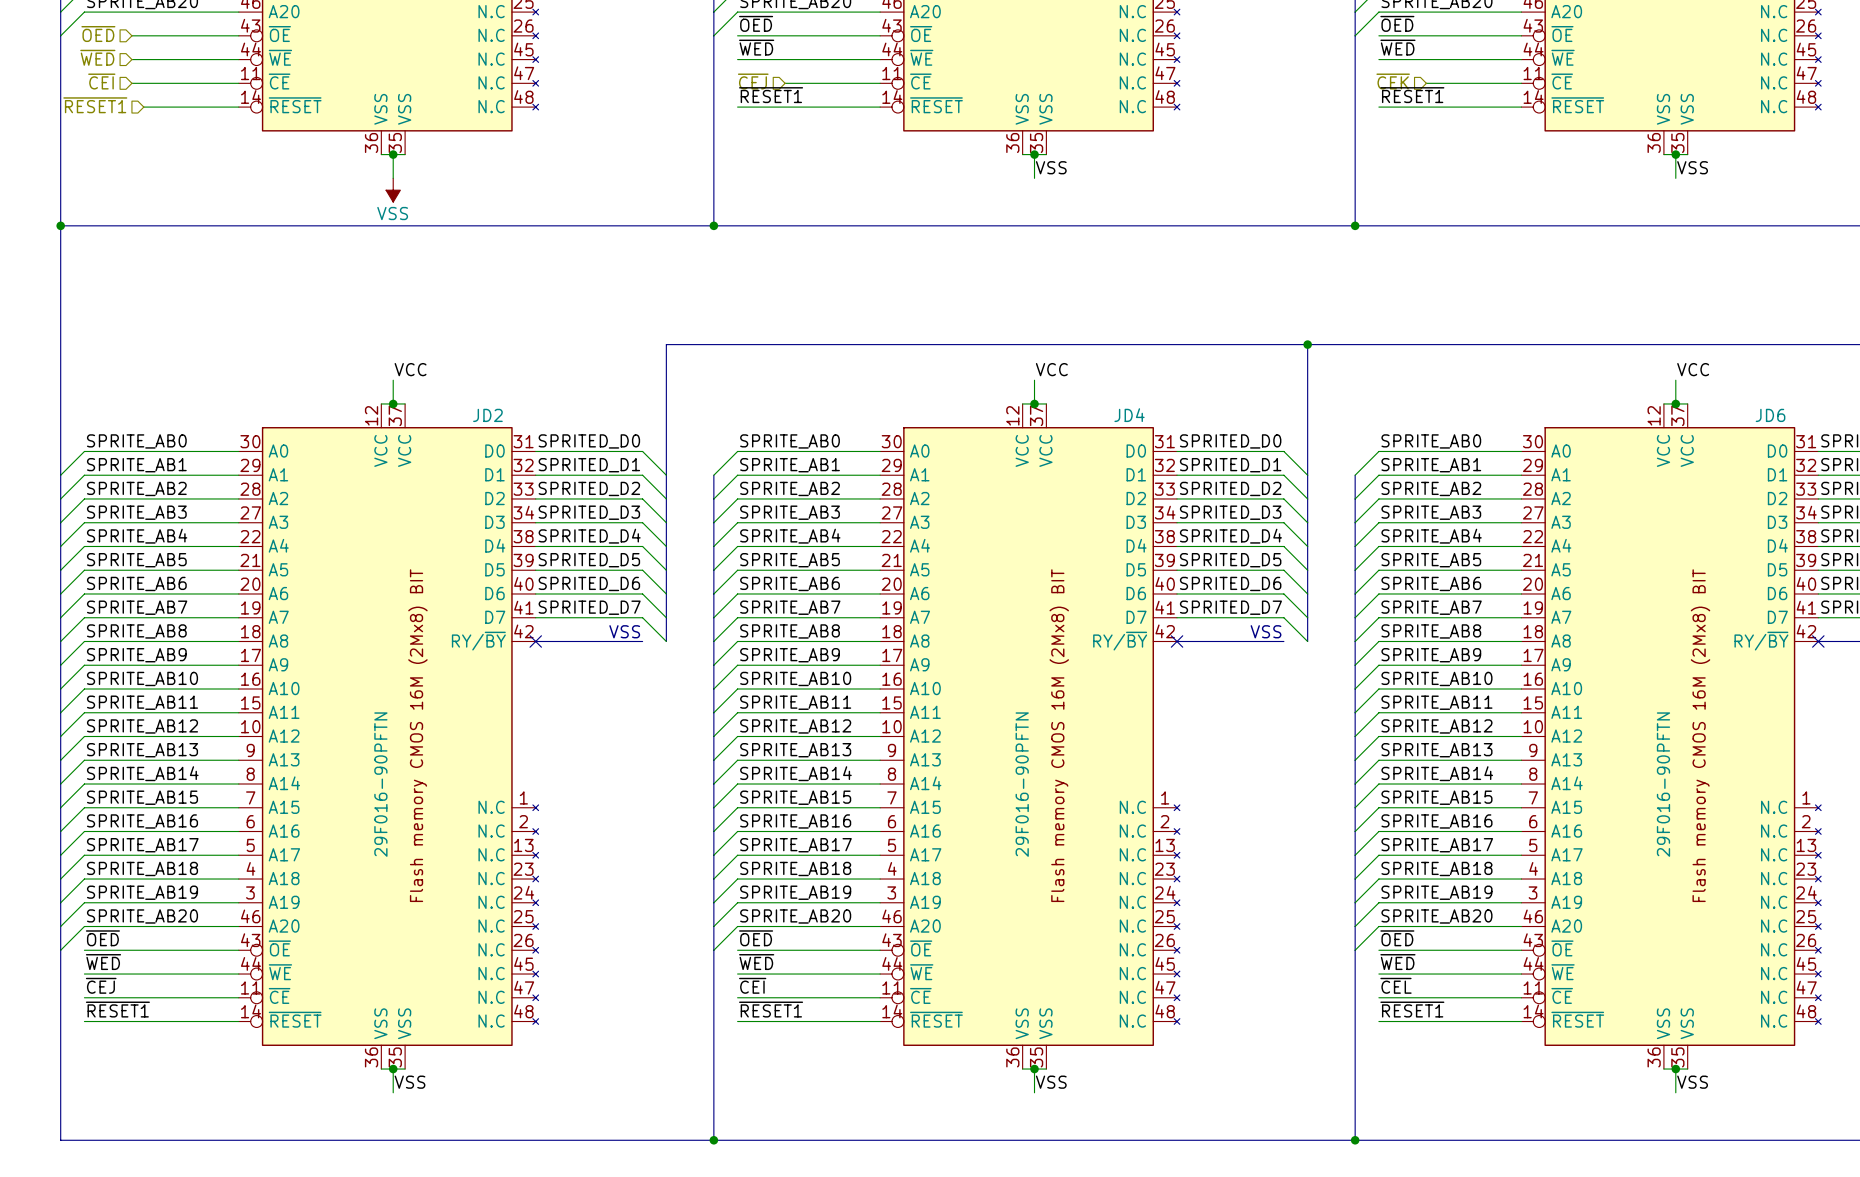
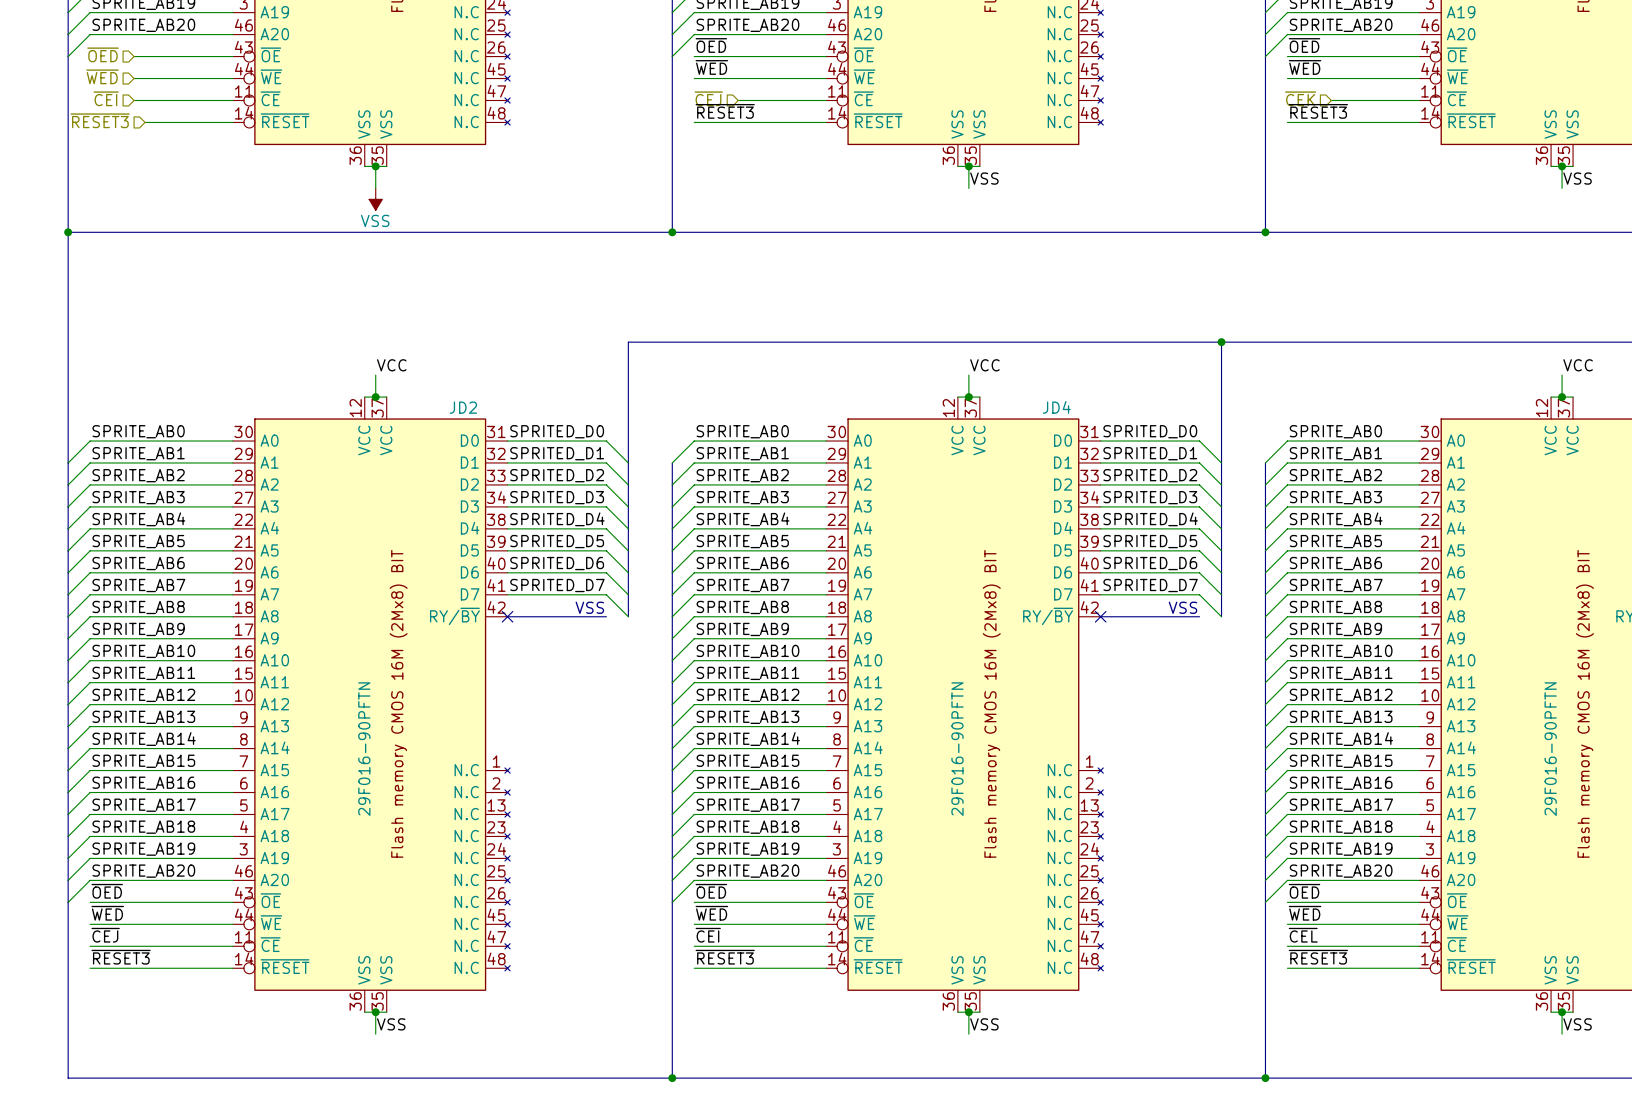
label: ~{RESET1} (771, 95) -> ~{RESET3} (725, 111)
label: ~{RESET1} (1412, 95) -> ~{RESET3} (1318, 111)
hierarchical label: ~{RESET1} (95, 105) -> ~{RESET3} (100, 120)
label: ~{RESET1} (117, 1009) -> ~{RESET3} (121, 957)
label: ~{RESET1} (771, 1009) -> ~{RESET3} (725, 957)
label: ~{RESET1} (1412, 1009) -> ~{RESET3} (1318, 957)

